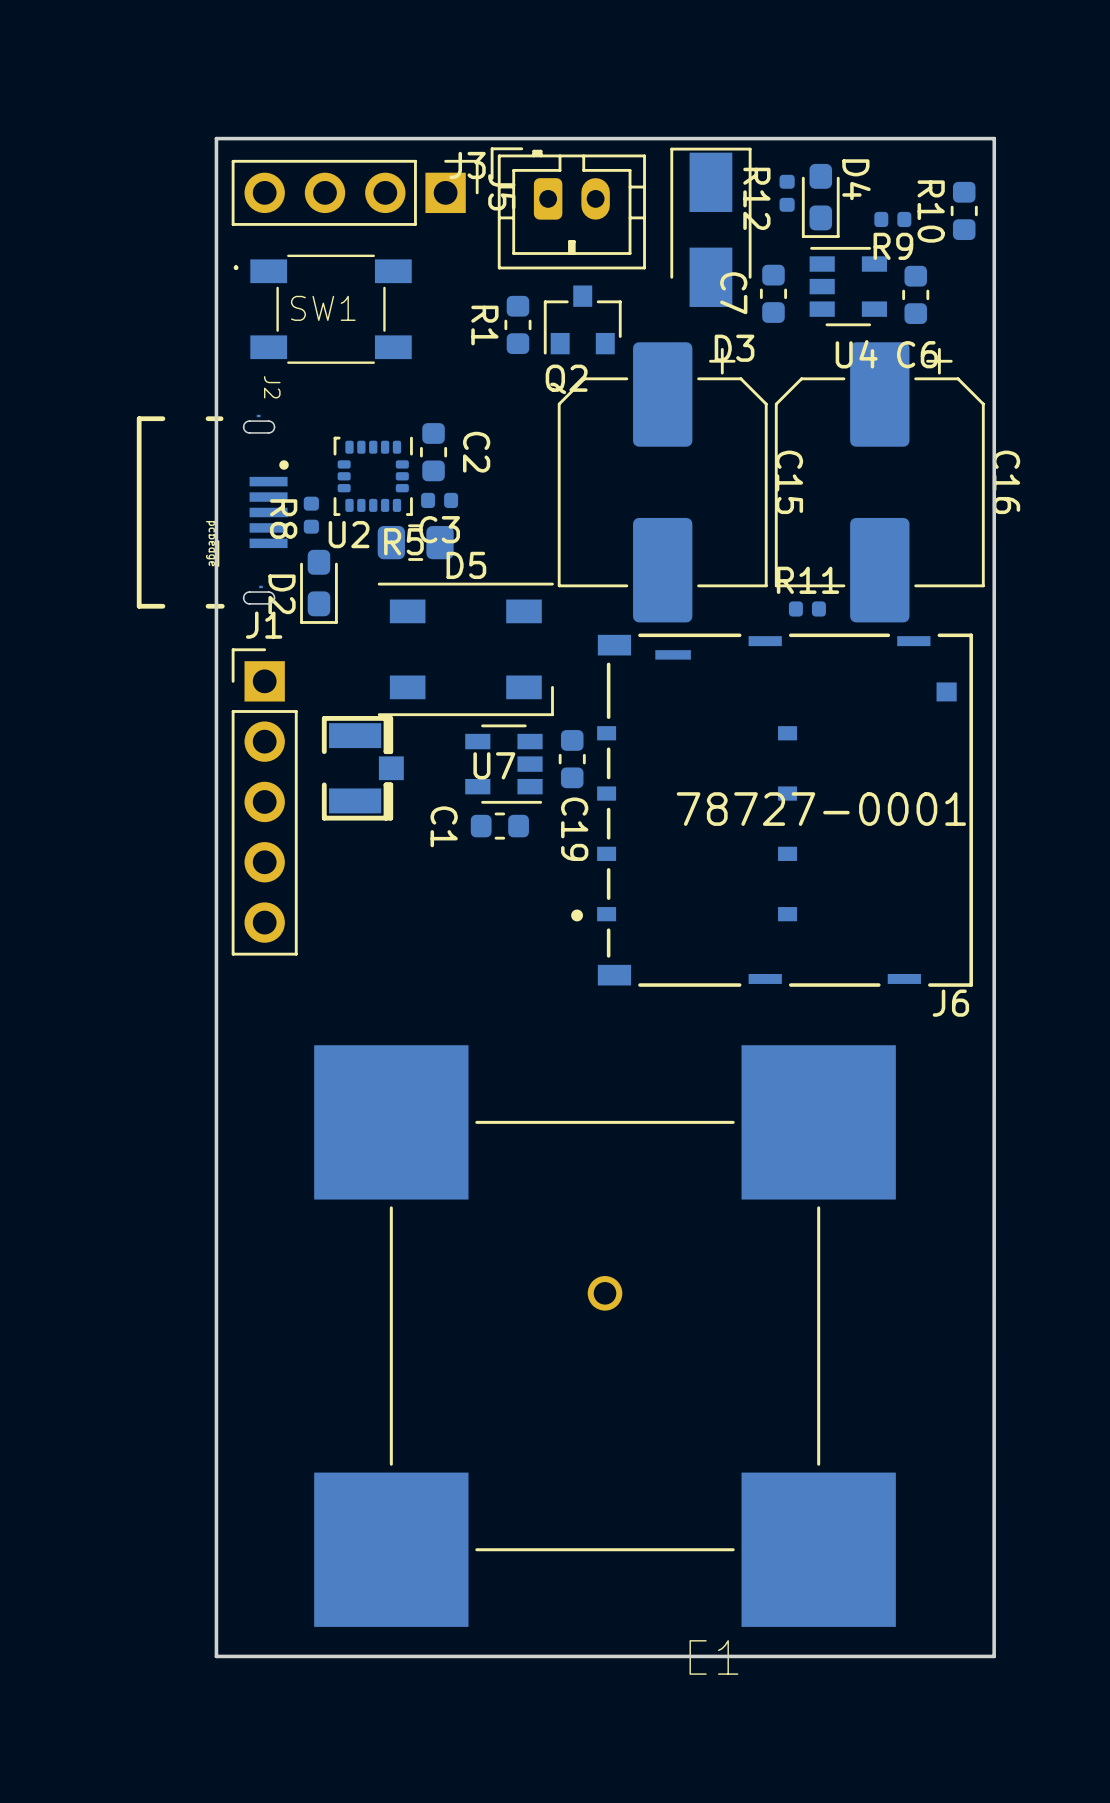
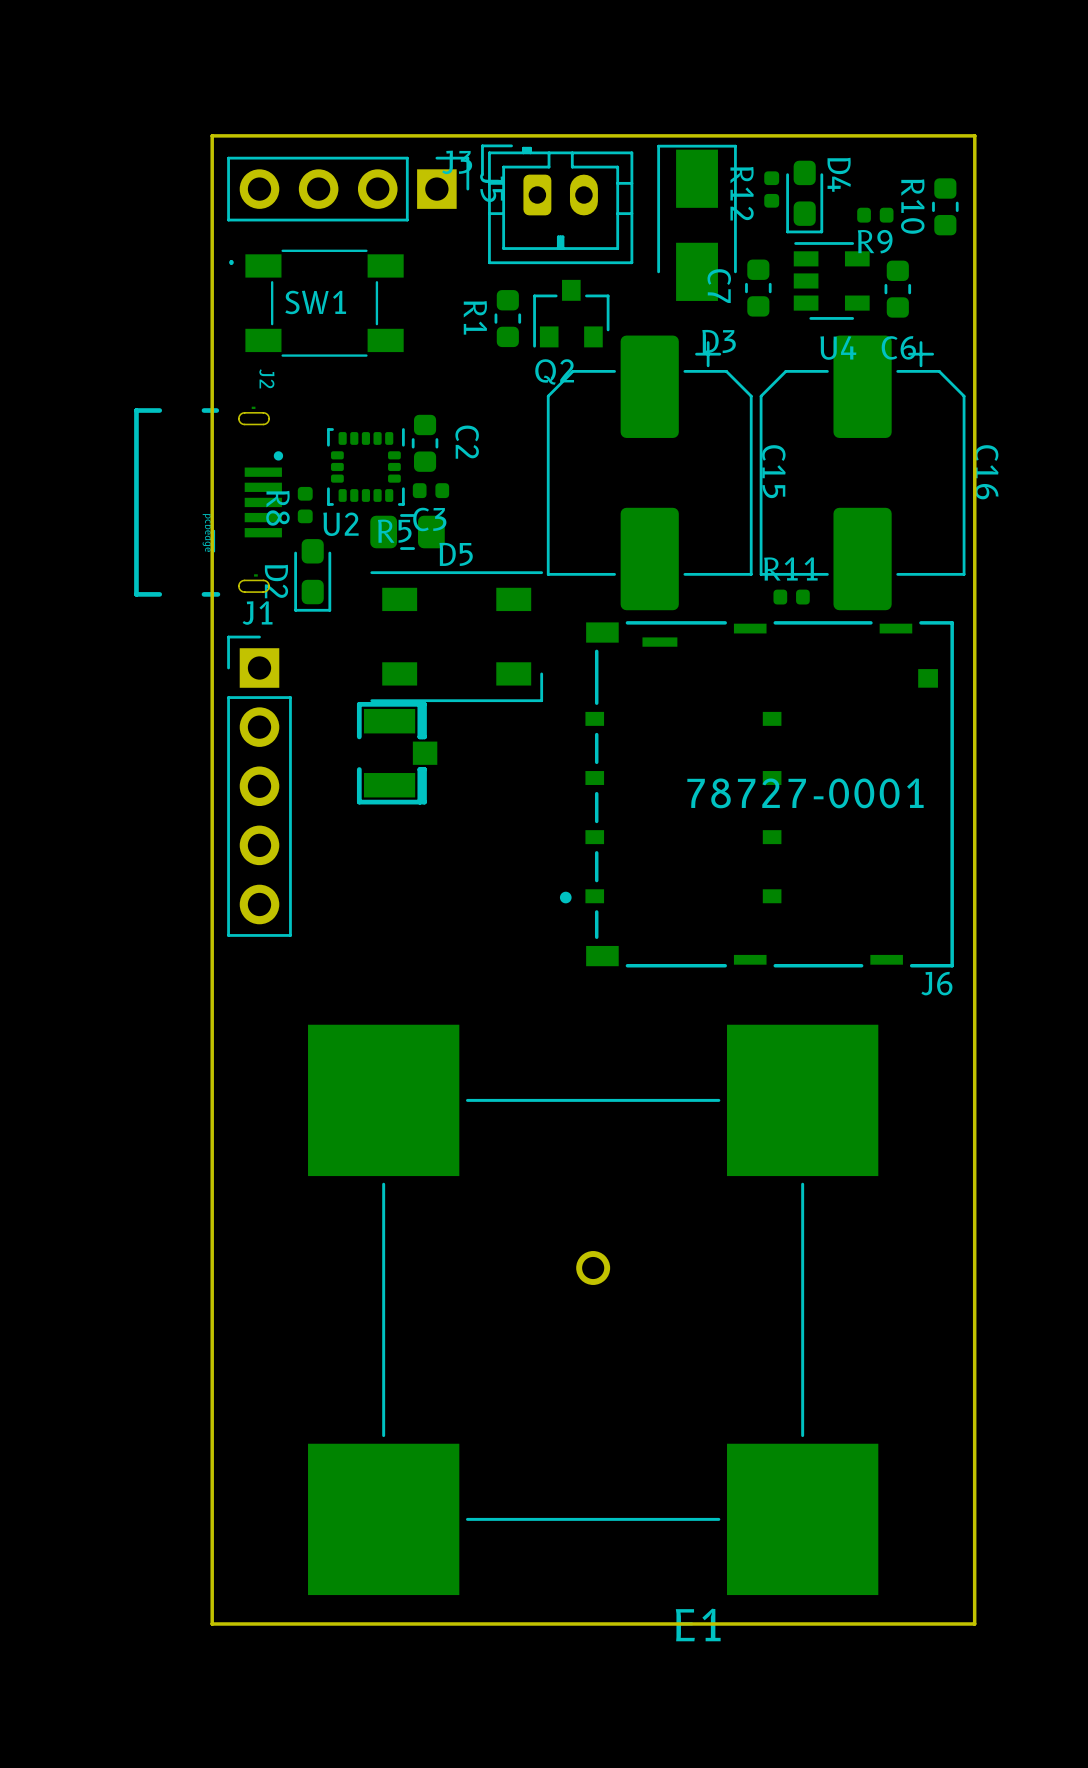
C19: (572, 759) -> none
U7: (503, 764) -> none
part position: (362, 768) -> (397, 753)
C1: (499, 826) -> none

